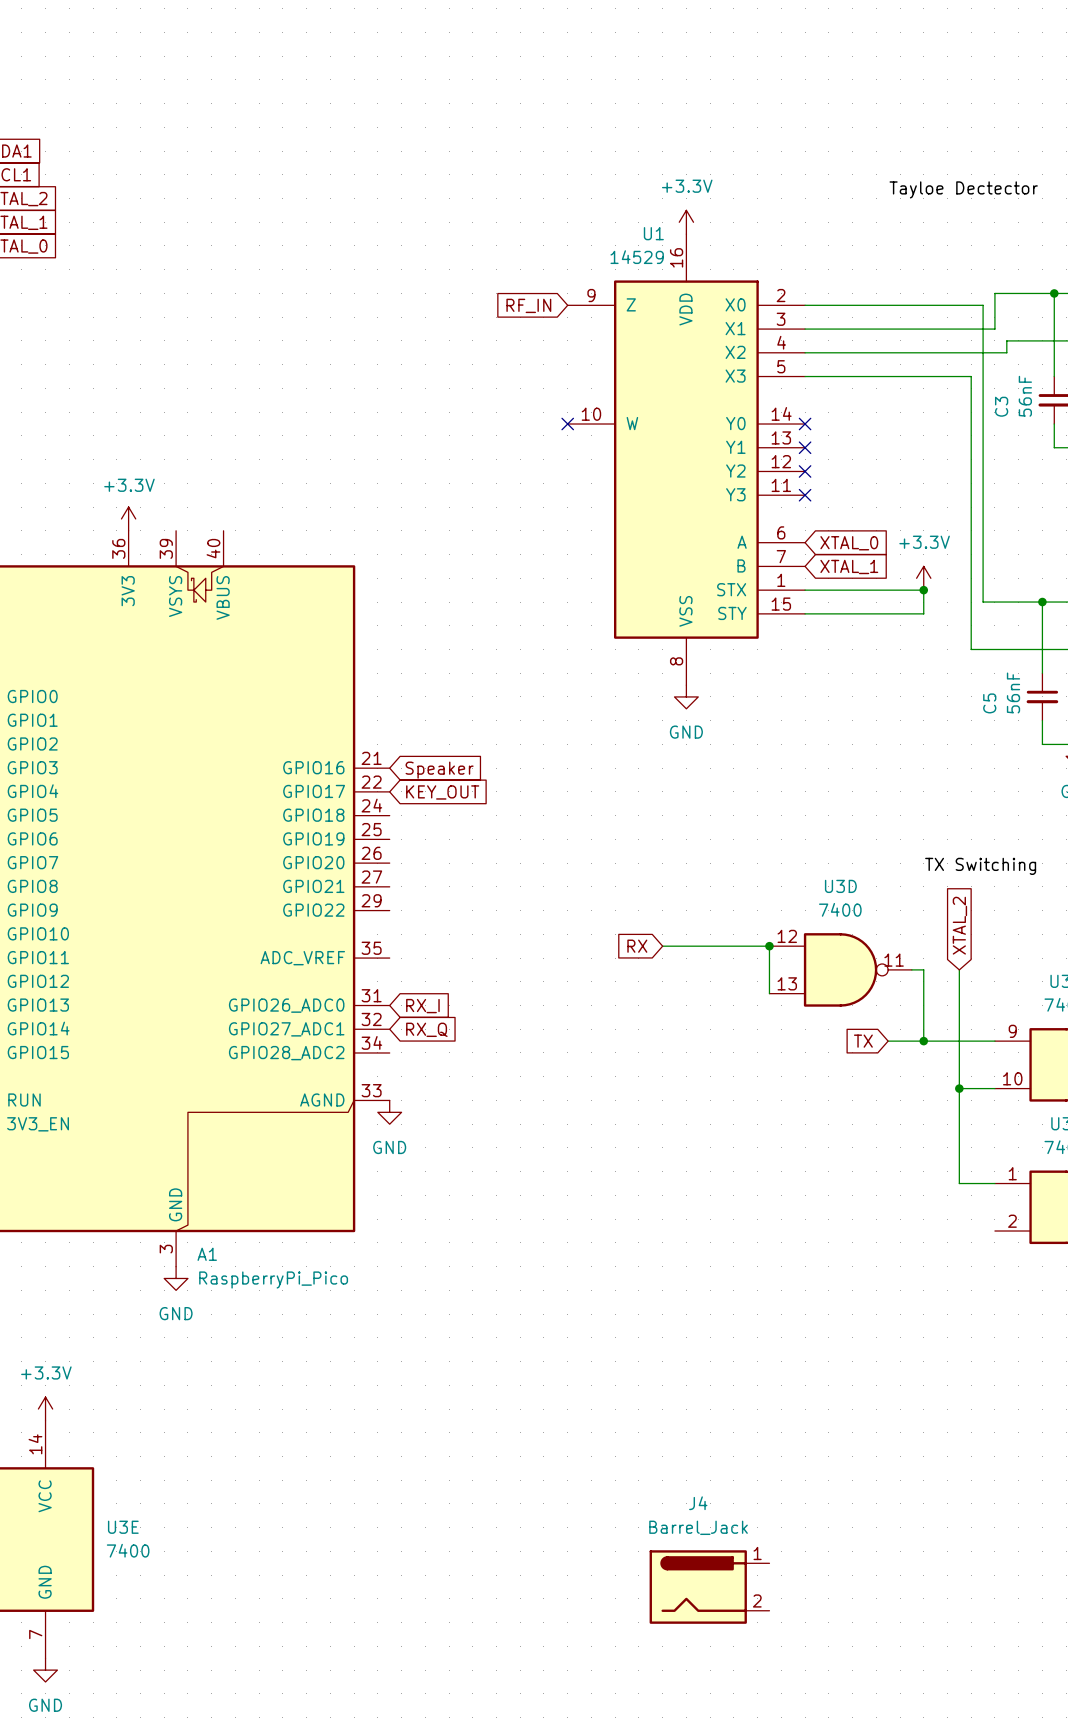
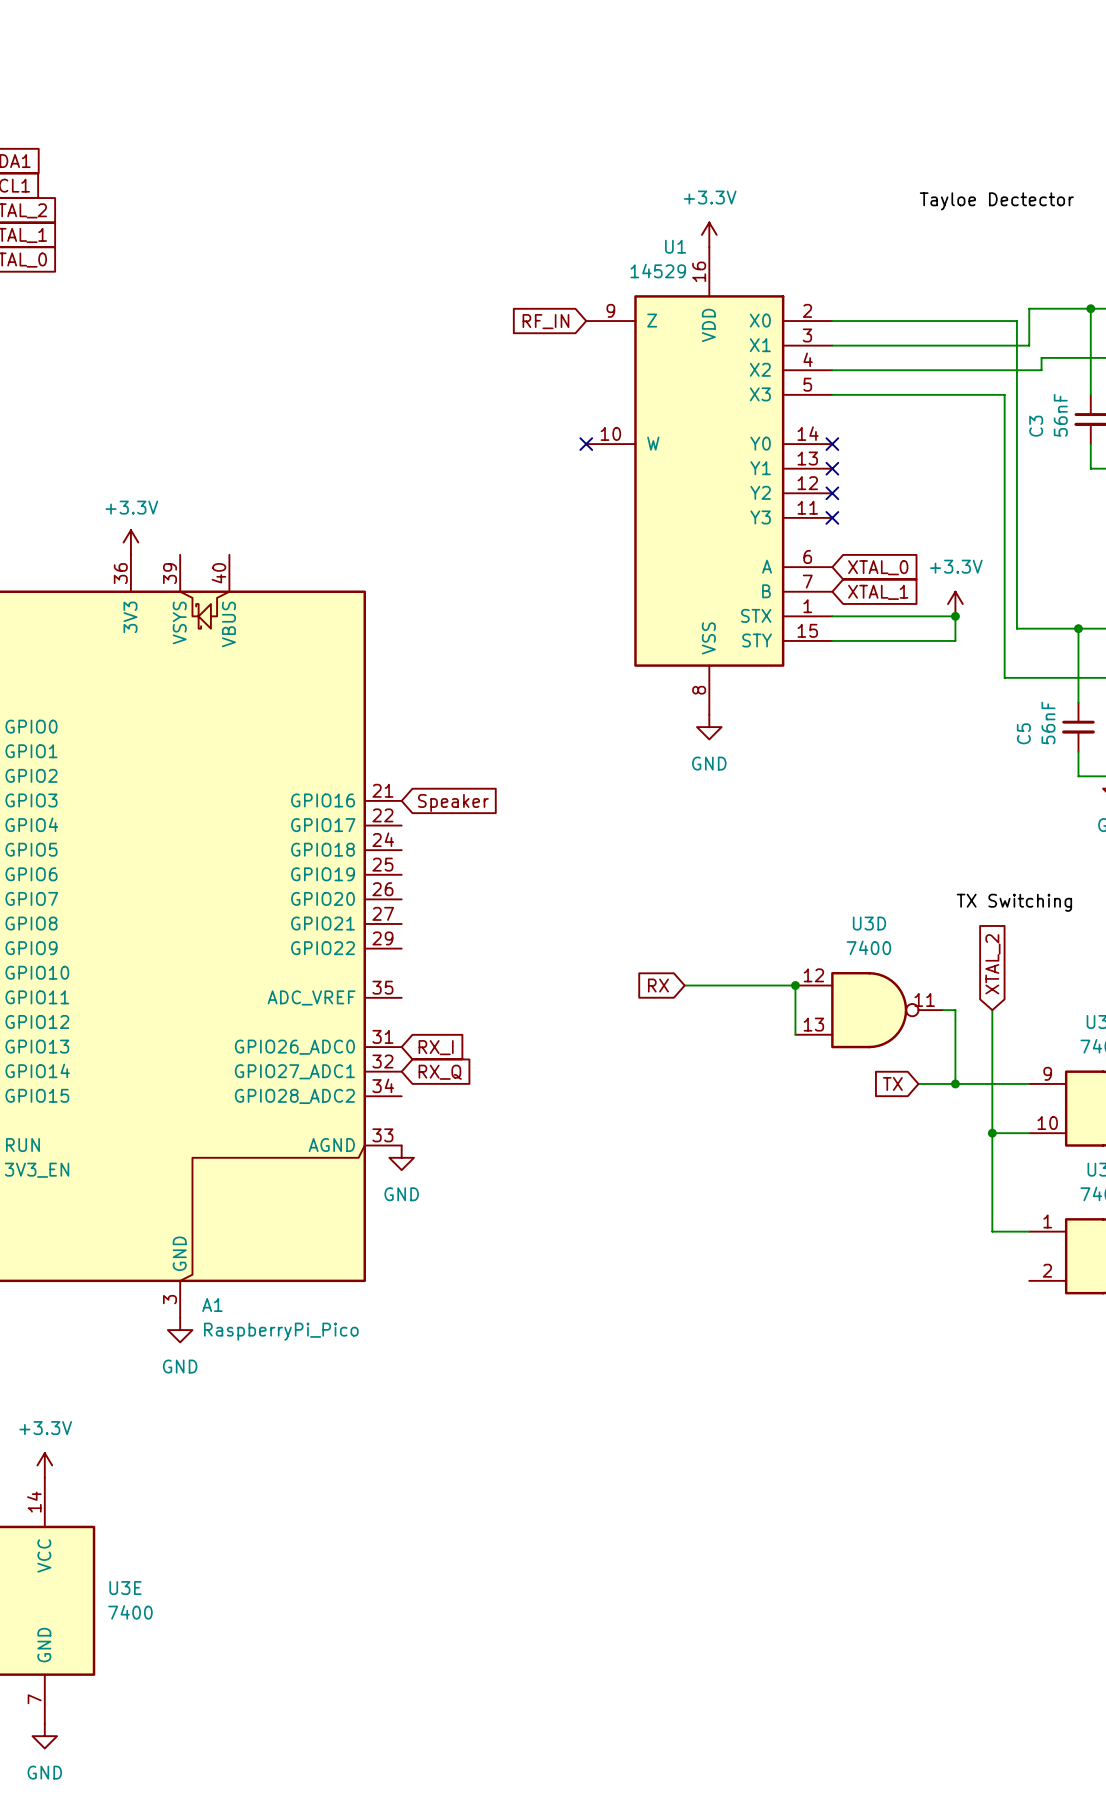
global label: KEY_OUT (442, 792) -> none
J4: Barrel_Jack (709, 1587) -> none

